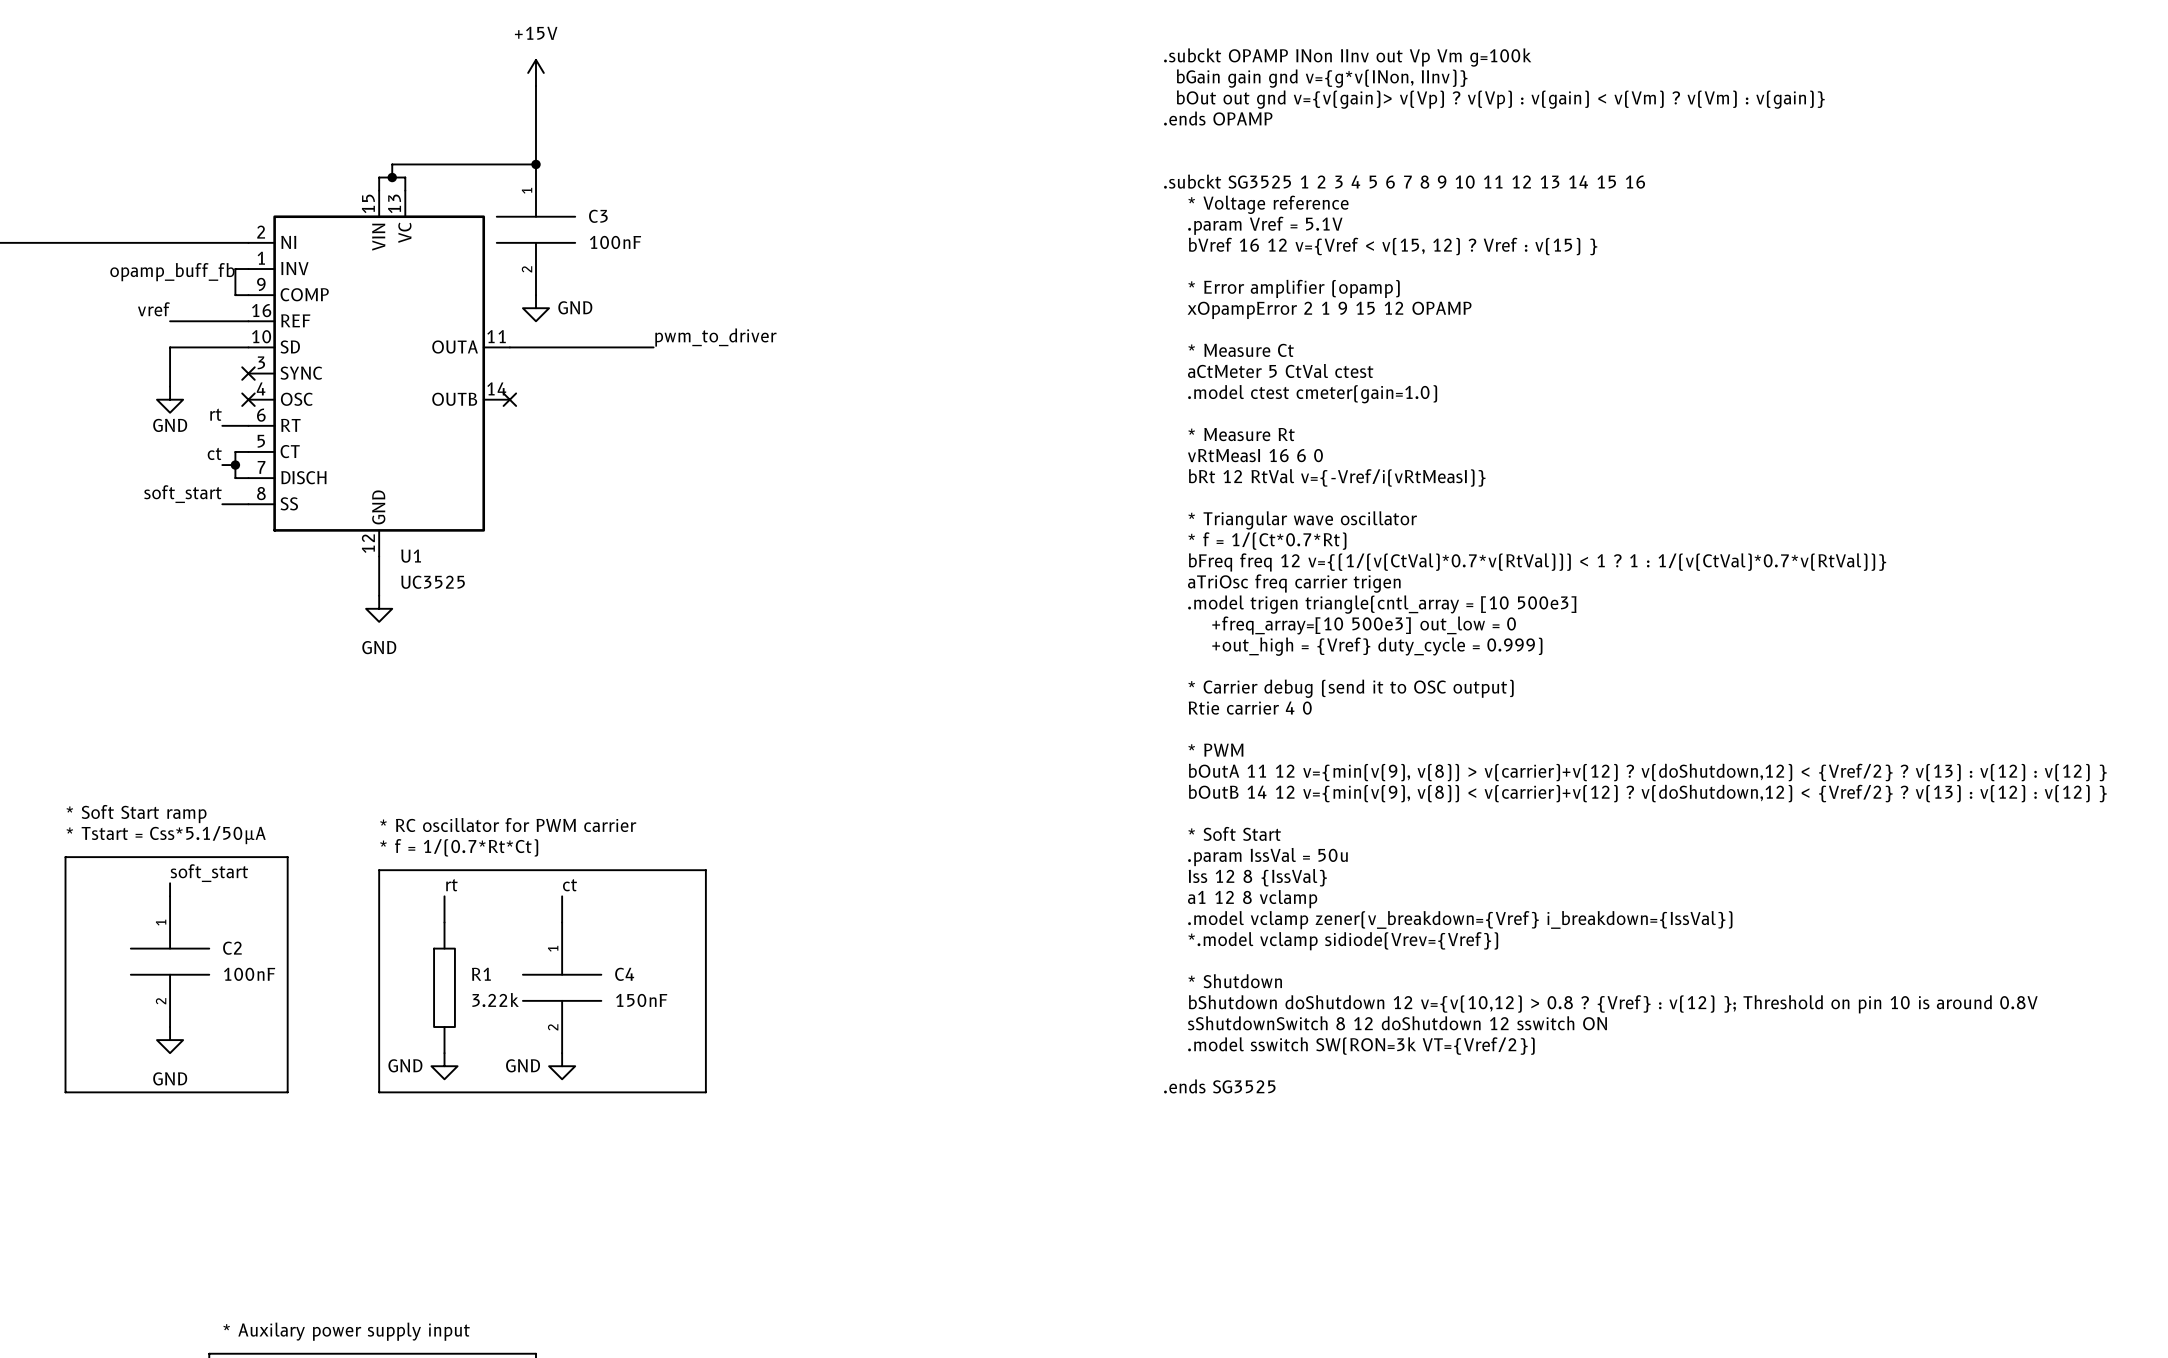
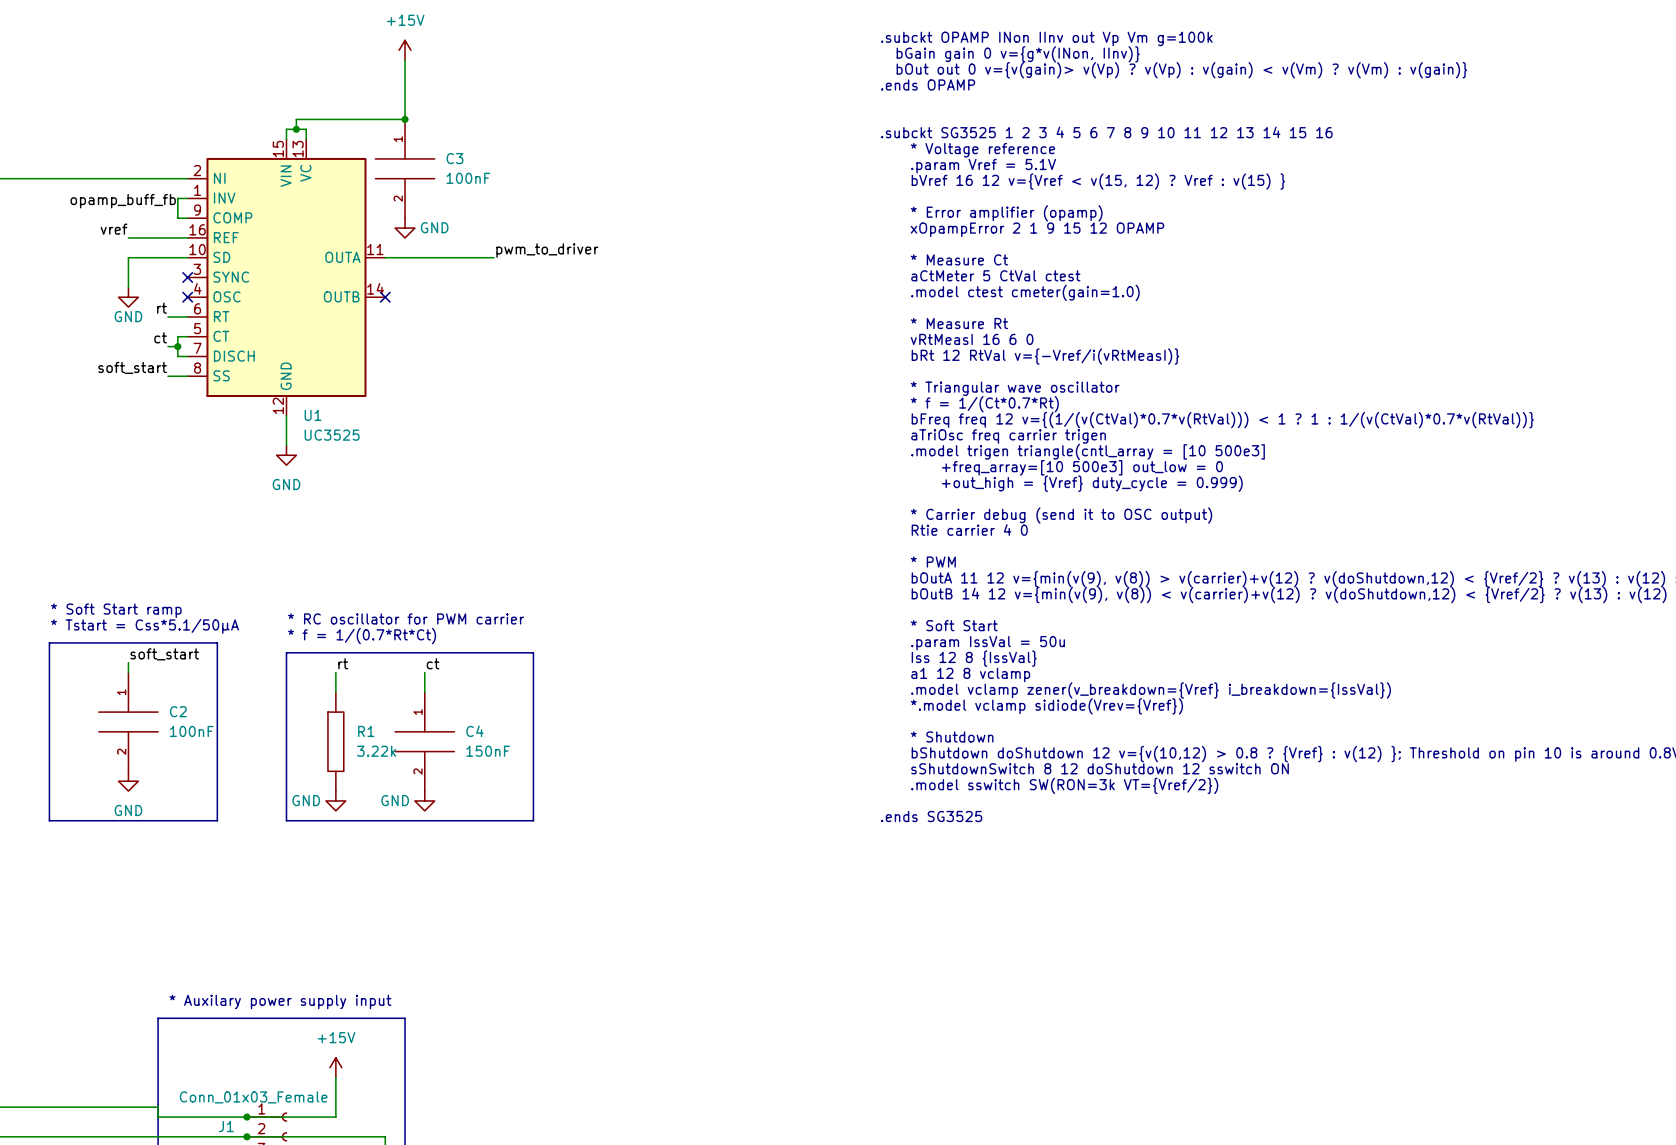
text: bGain gain gnd v={g*v(INon, IInv)} (1322, 78) -> bGain gain 0 v={g*v(INon, IInv)} (1018, 54)
text: bOut out gnd v={v(gain)> v(Vp) ? v(Vp) : v(gain) < v(Vm) ? v(Vm) : v(gain)} (1500, 99) -> bOut out 0 v={v(gain)> v(Vp) ? v(Vp) : v(gain) < v(Vm) ? v(Vm) : v(gain)} (1181, 70)

